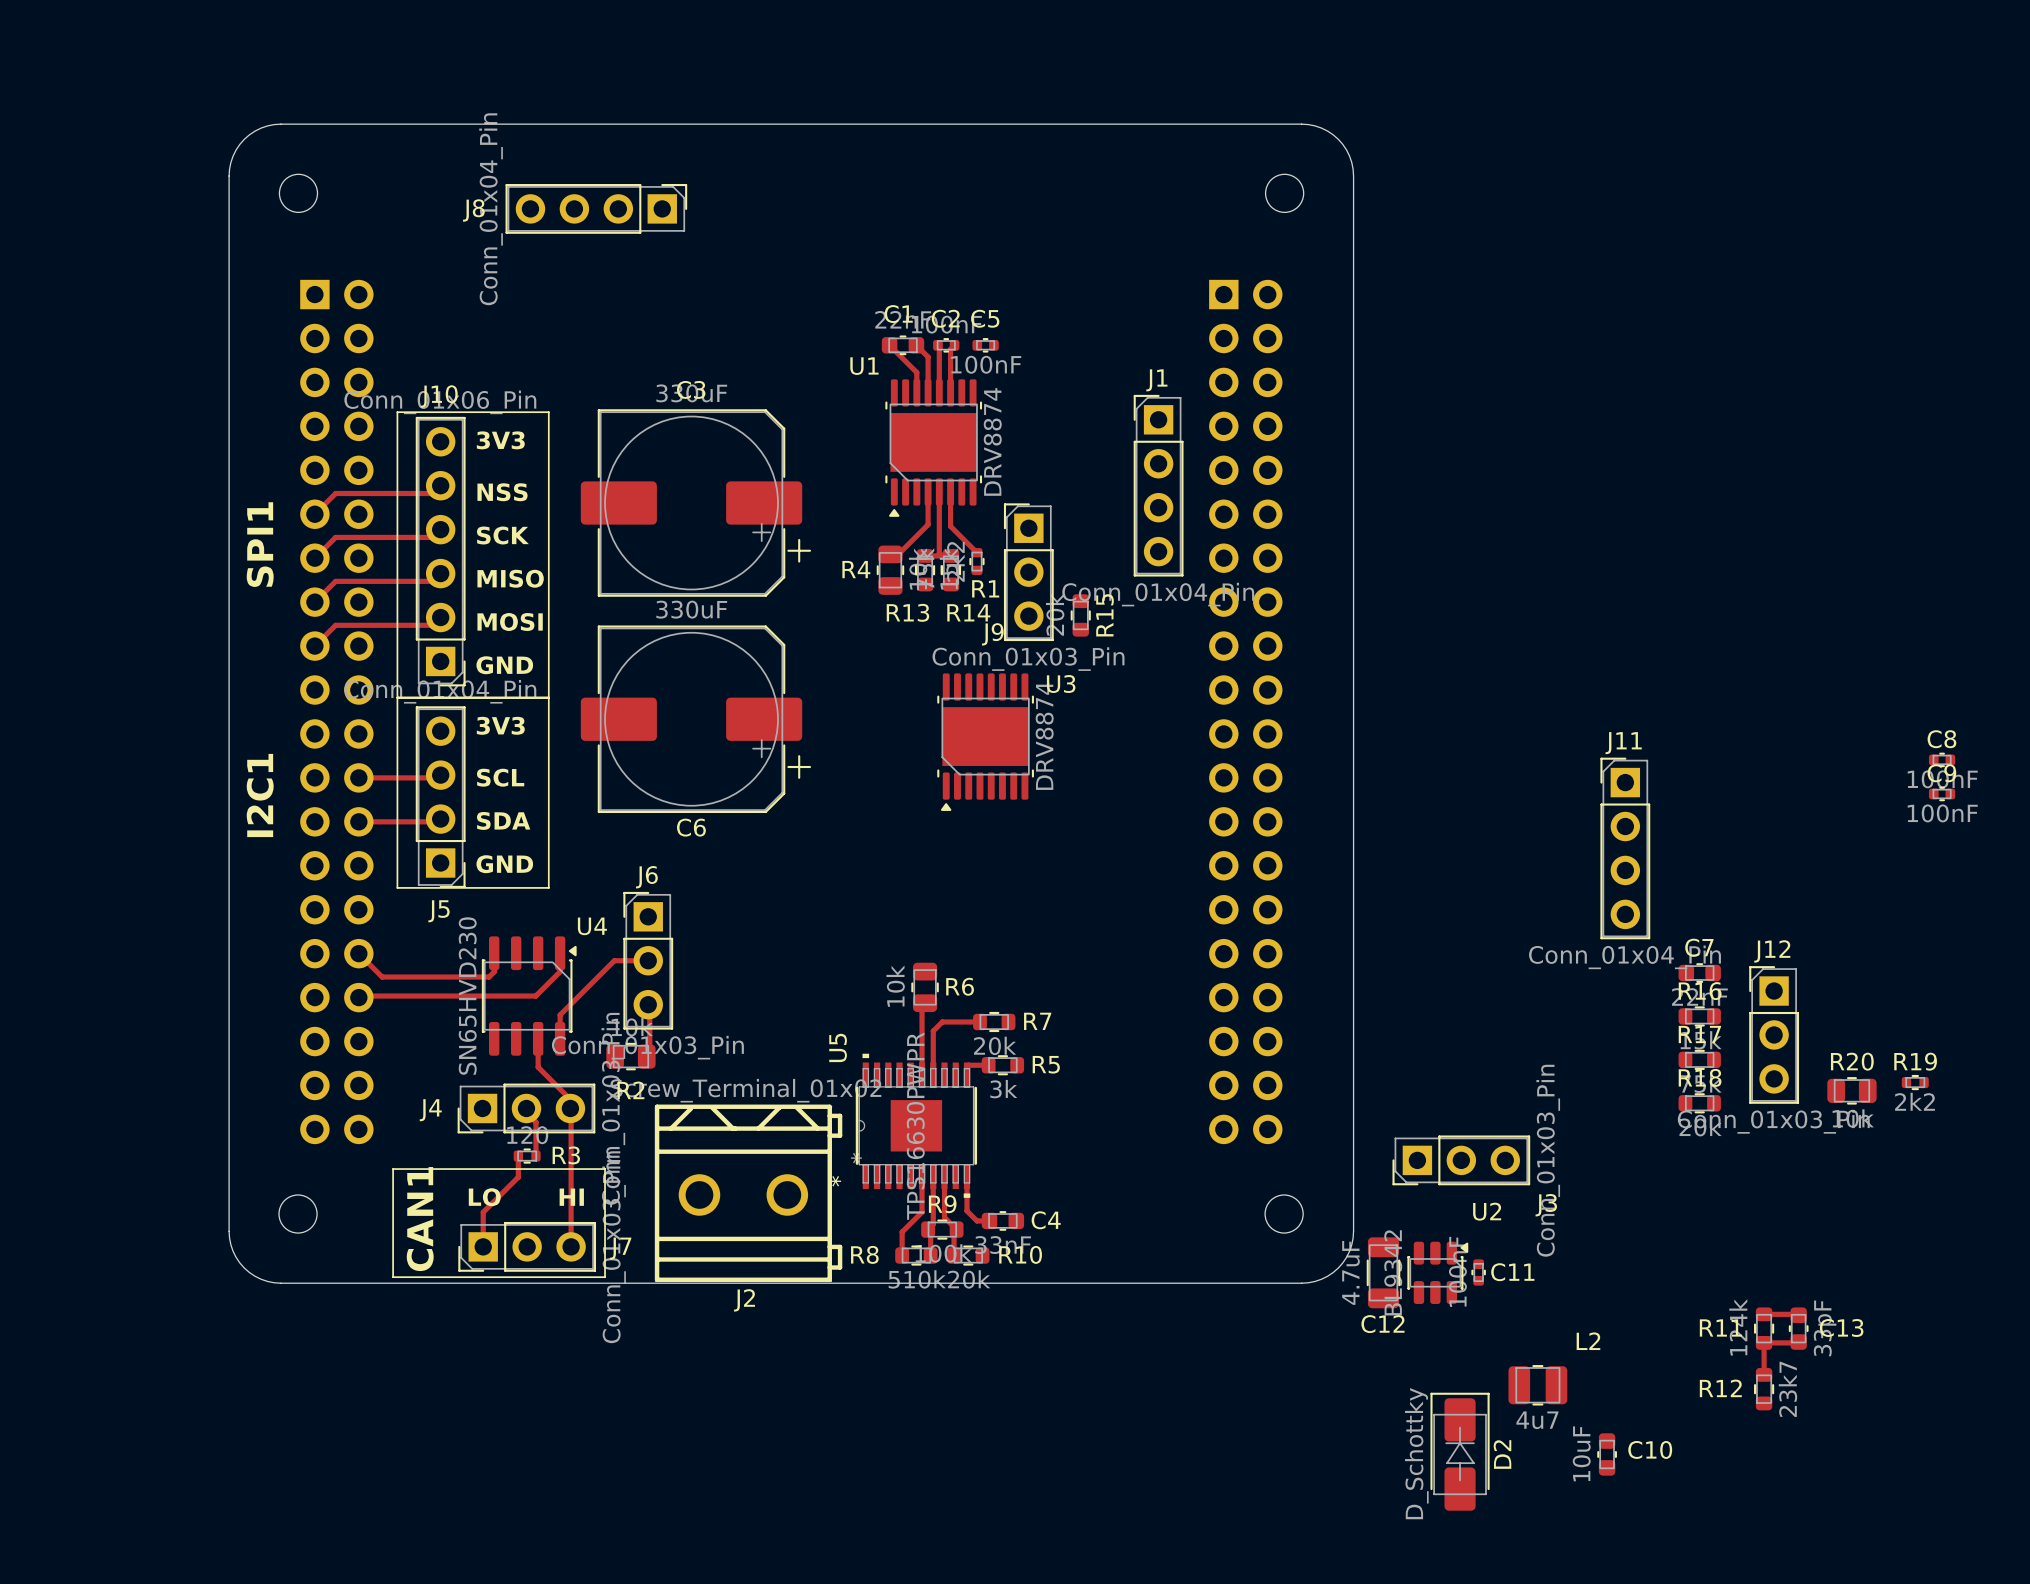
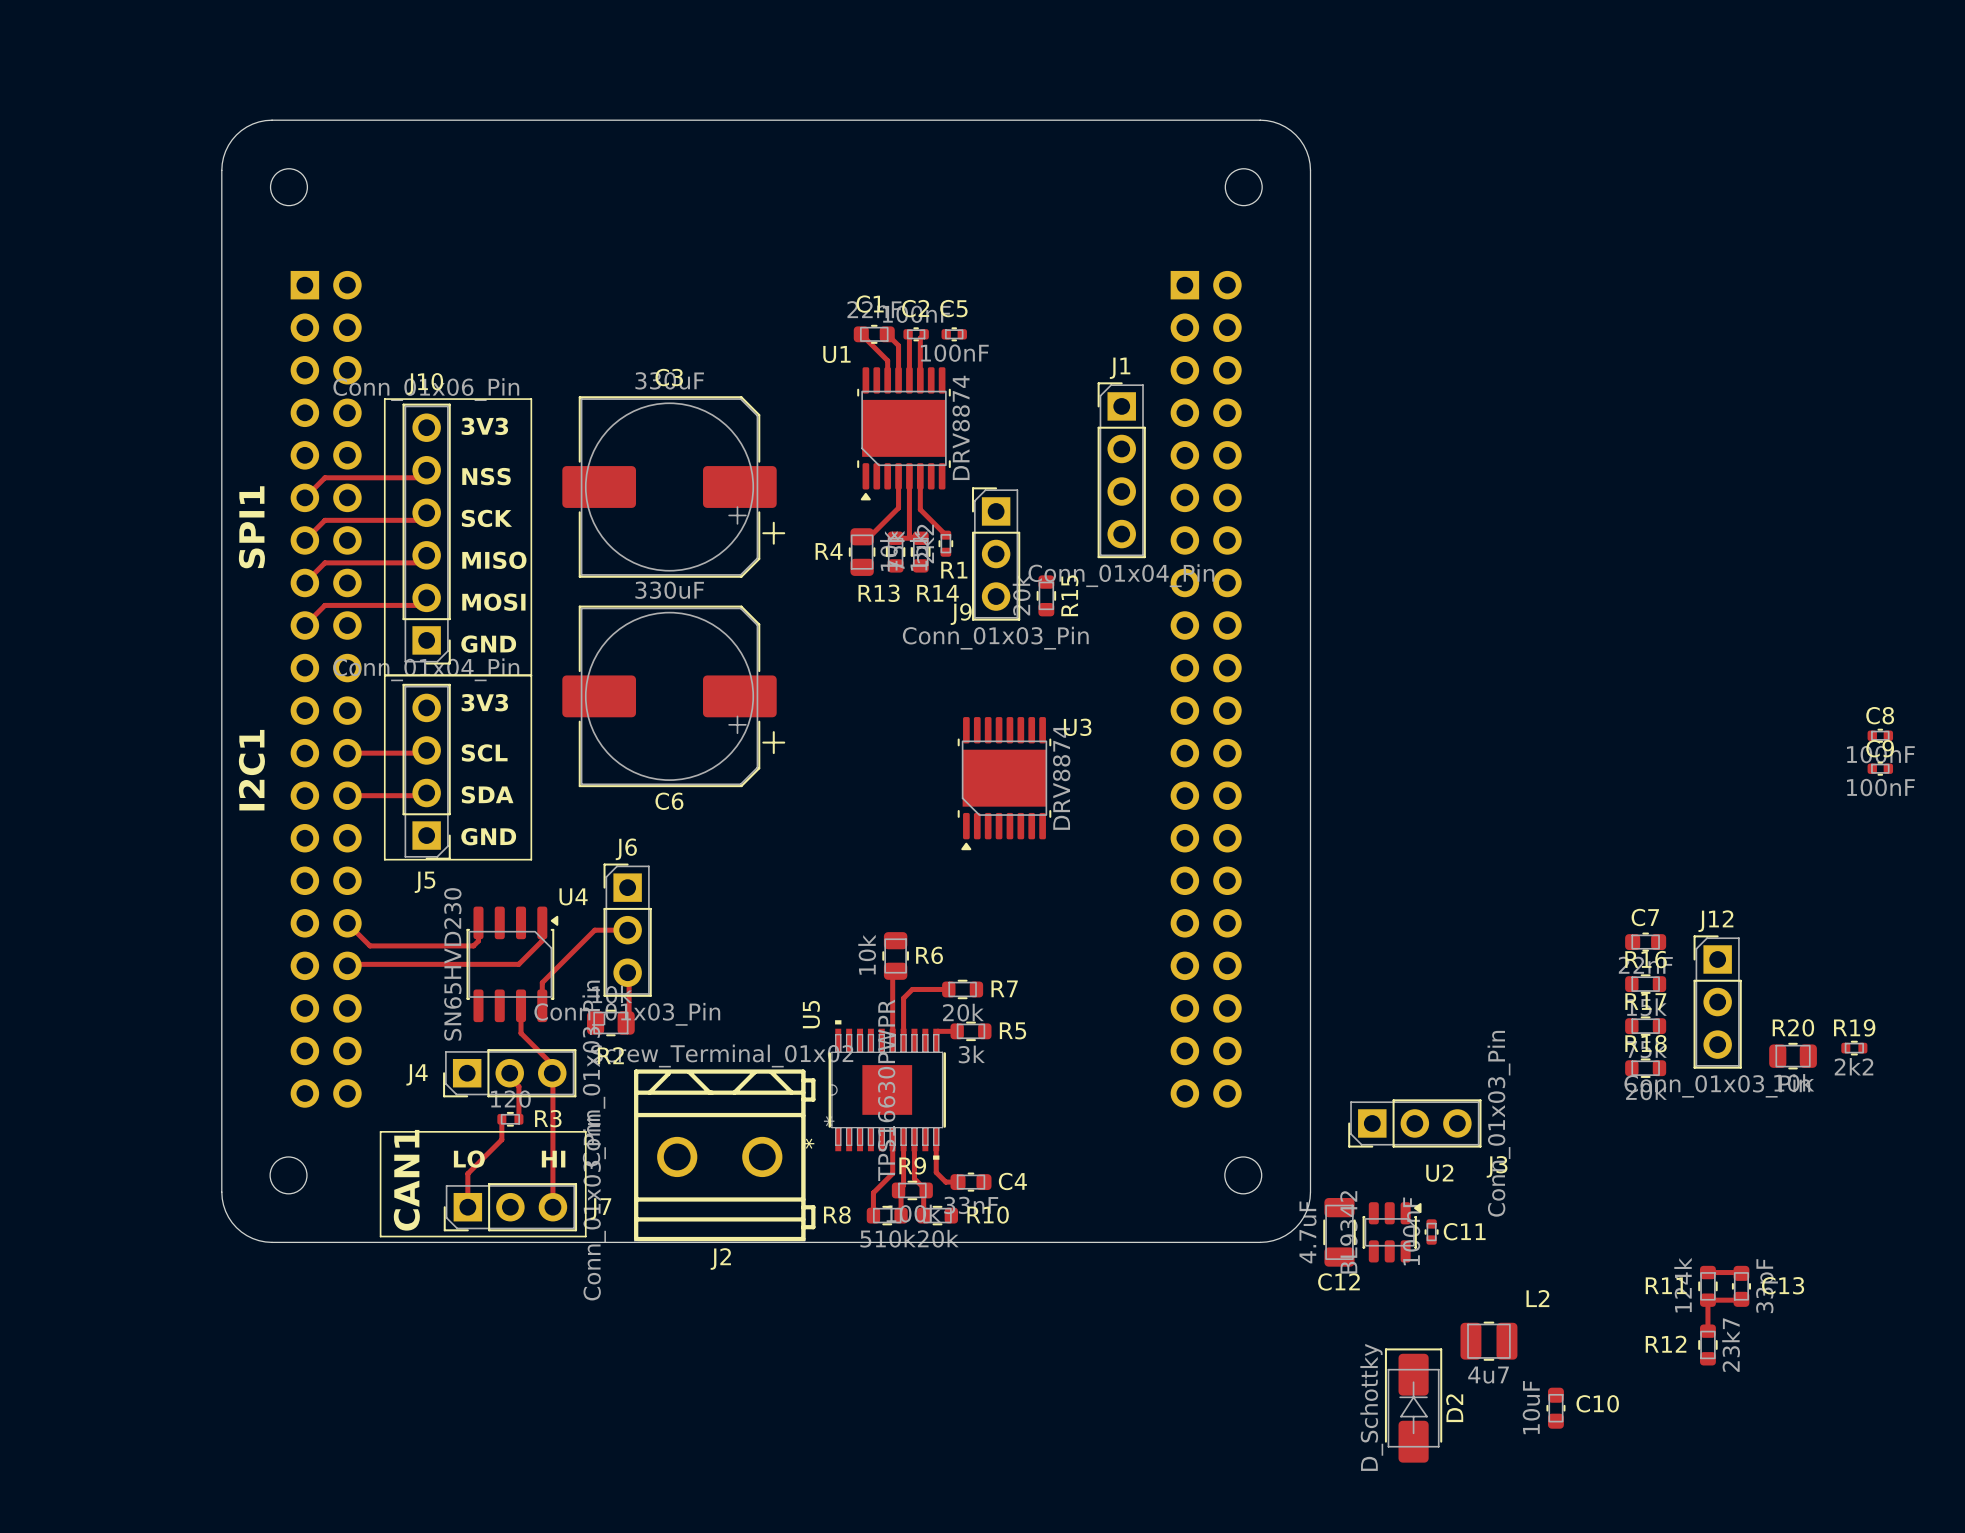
J8: Conn_01x04_Pin (596, 208) -> none
U3 position: (985, 742) -> (1004, 783)
J11: Conn_01x04_Pin (1625, 848) -> none

